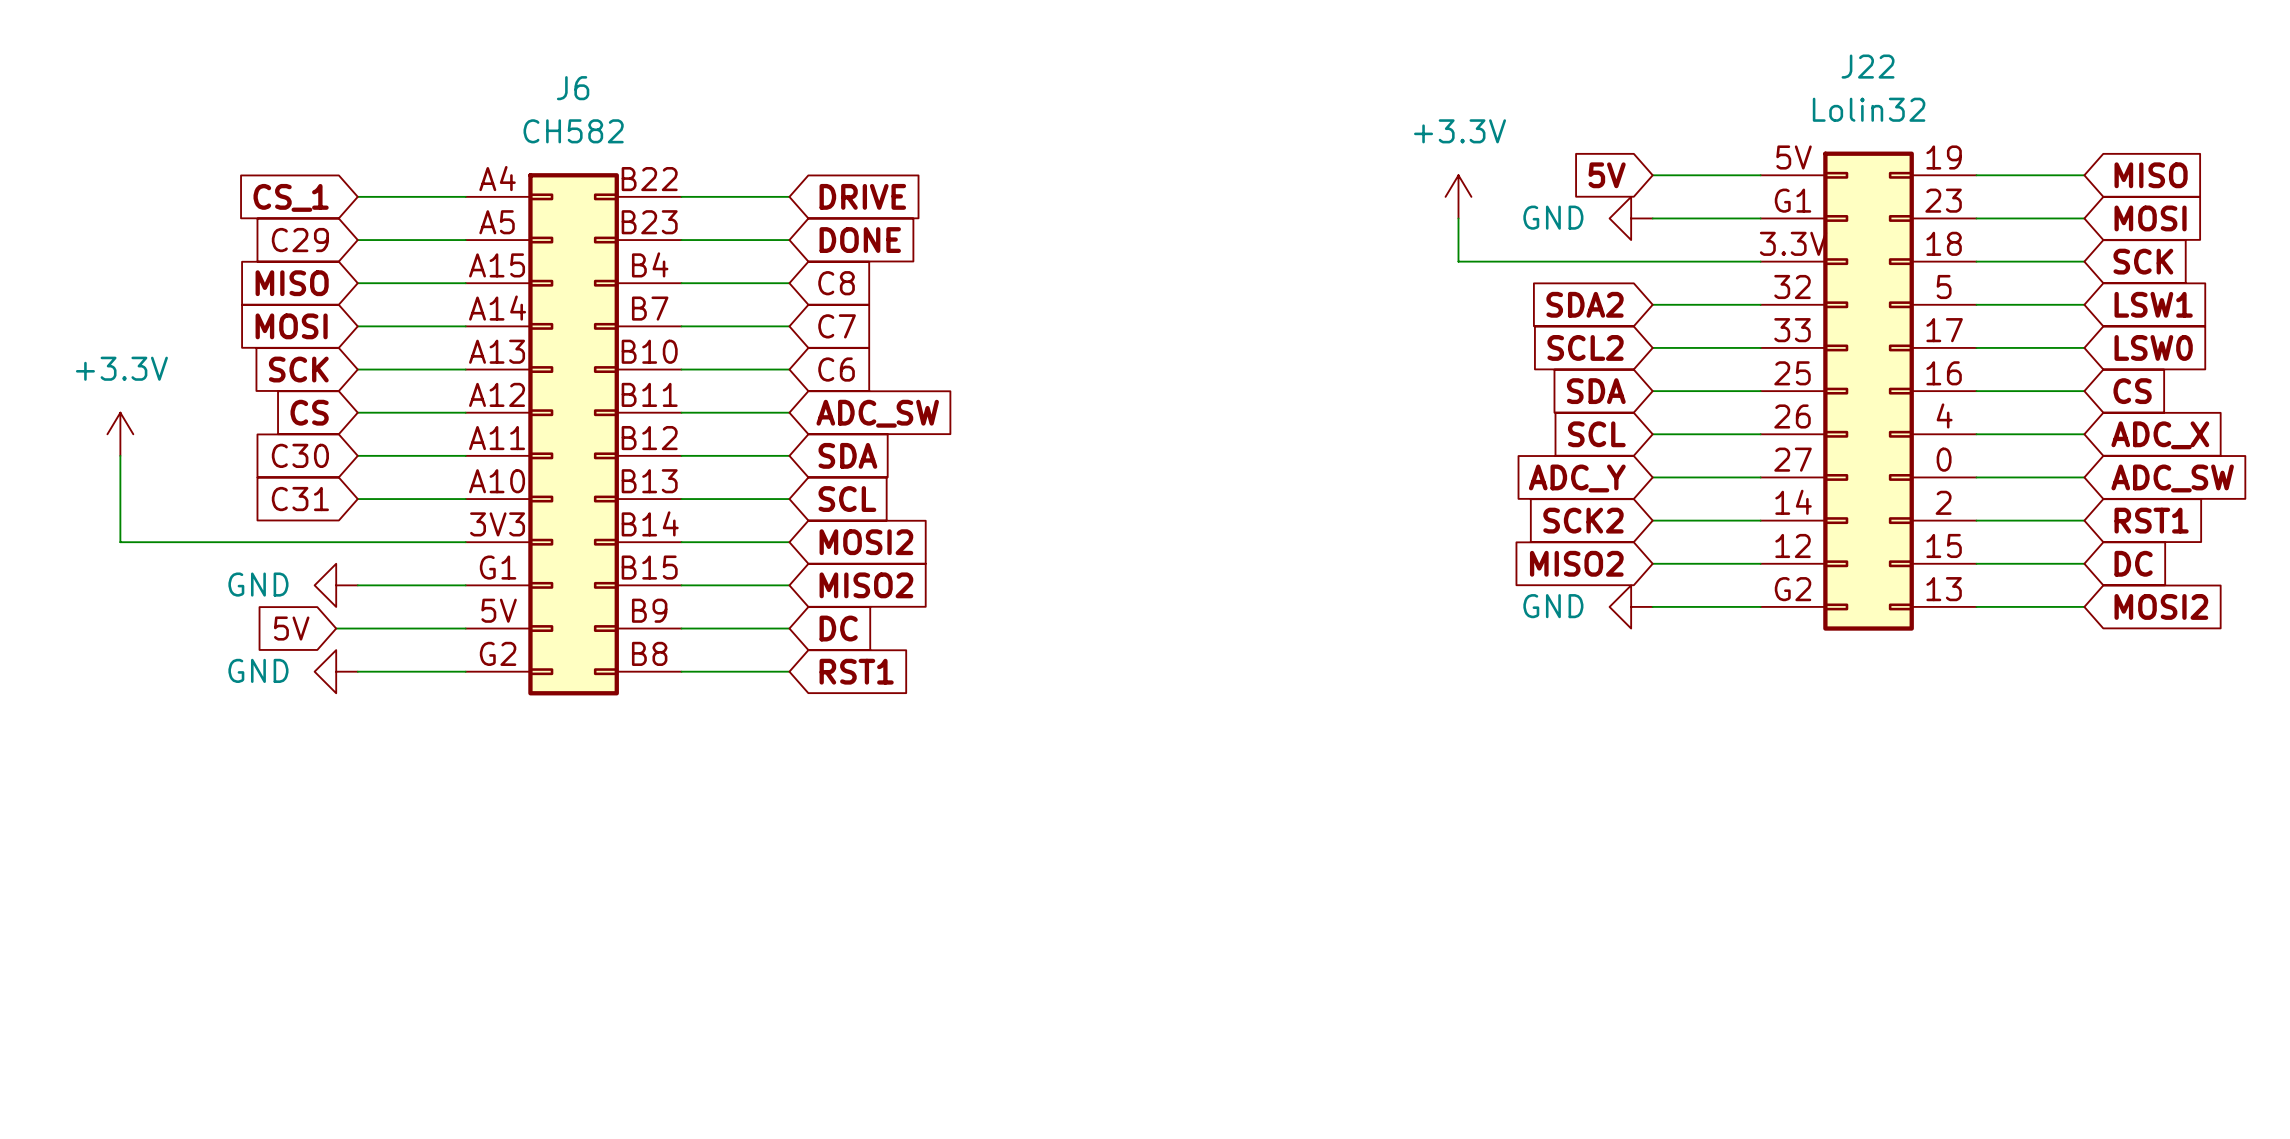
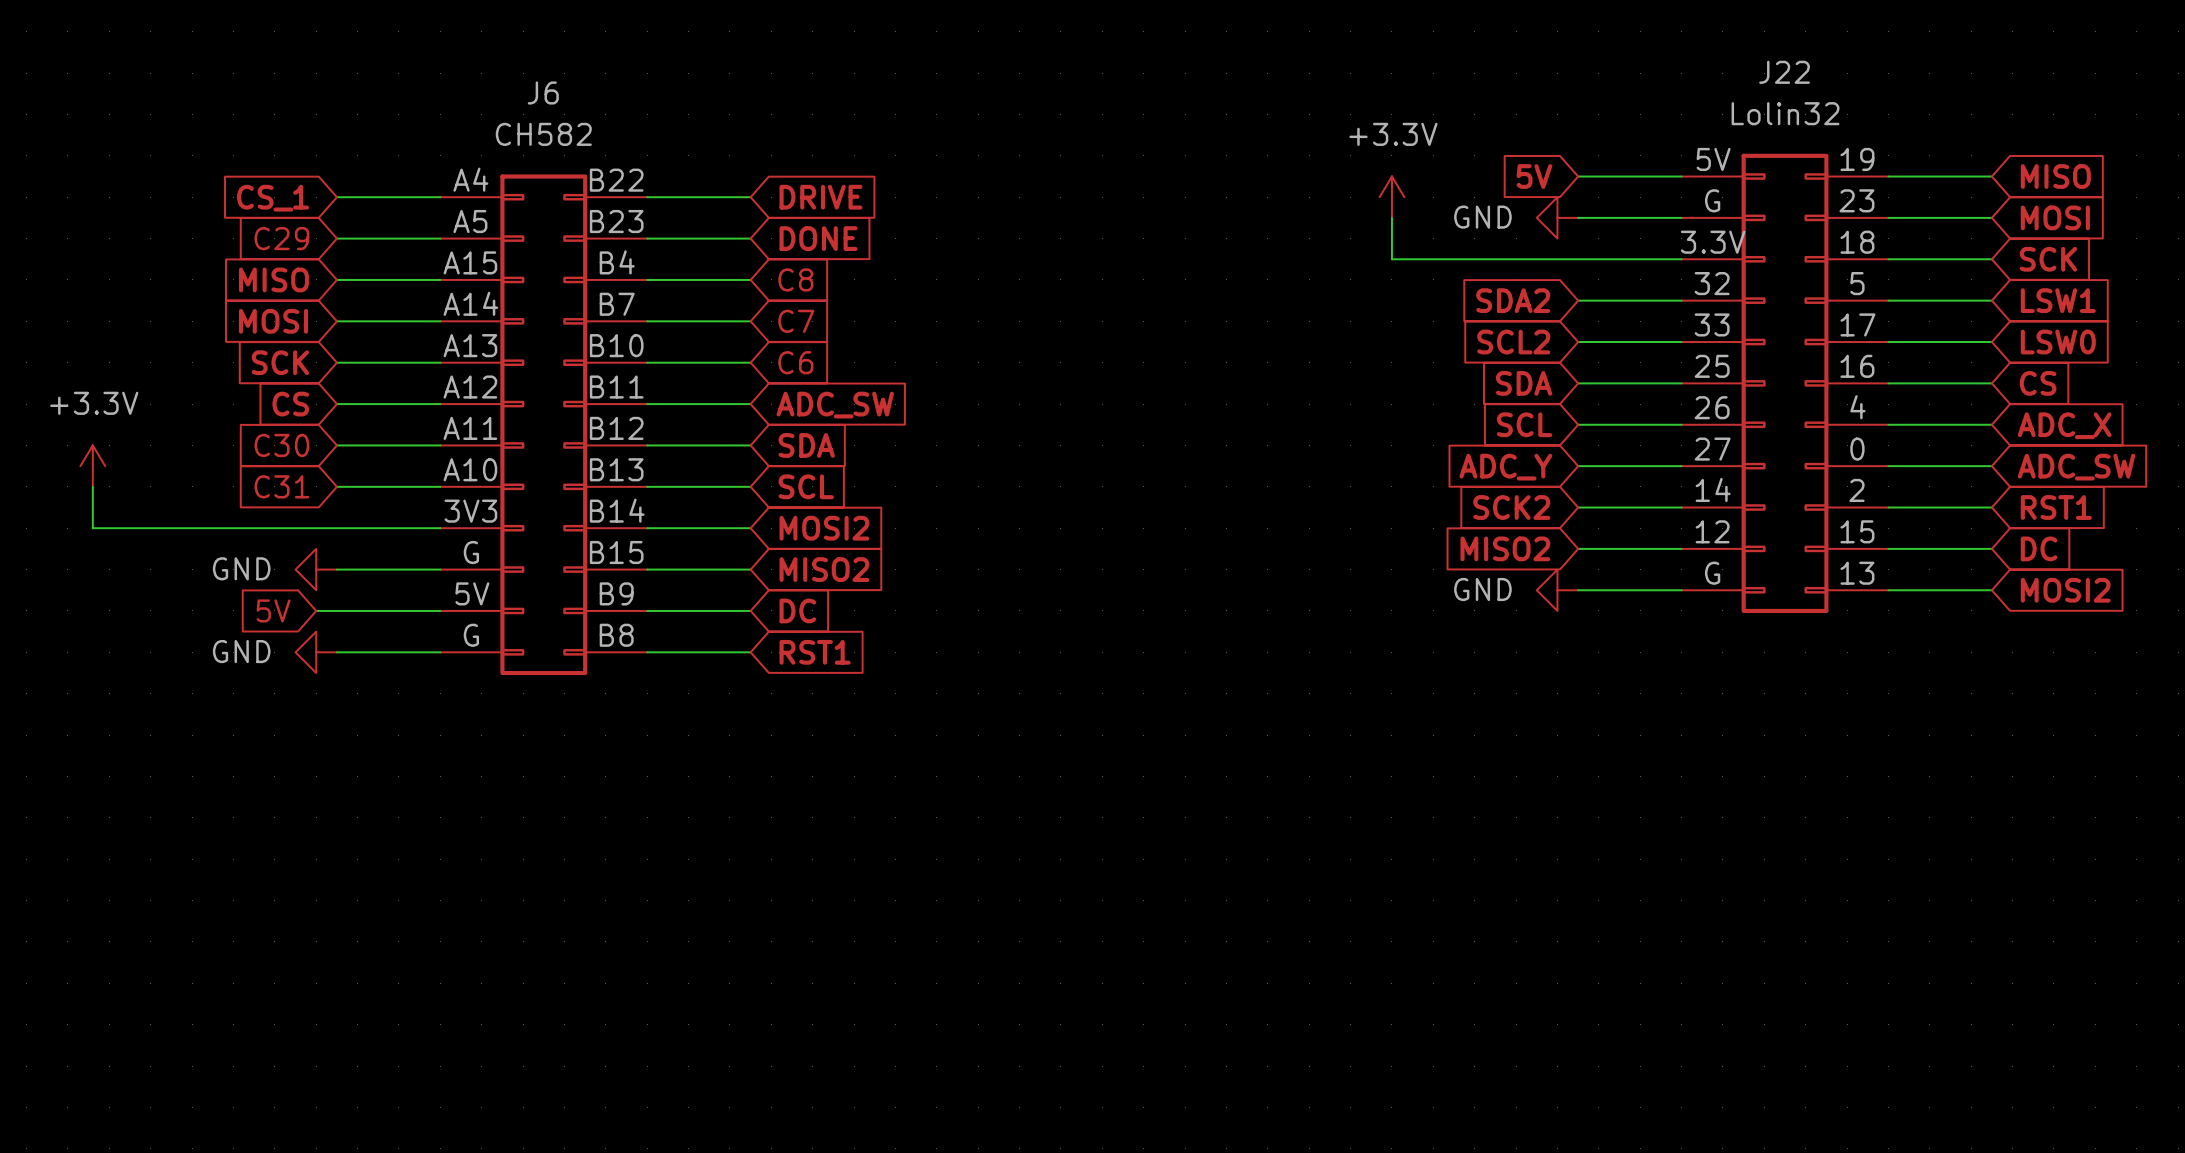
J22 pin number: G1 (1793, 200) -> G (1712, 200)
power symbol position: +3.3V (120, 434) -> +3.3V (92, 466)
wire: (120, 455) (120, 542) -> (92, 486) (92, 528) (109, 528)
J6 pin number: G1 (498, 567) -> G (471, 552)
J22 pin number: G2 (1793, 589) -> G (1712, 573)
J6 pin number: G2 (498, 653) -> G (471, 635)

